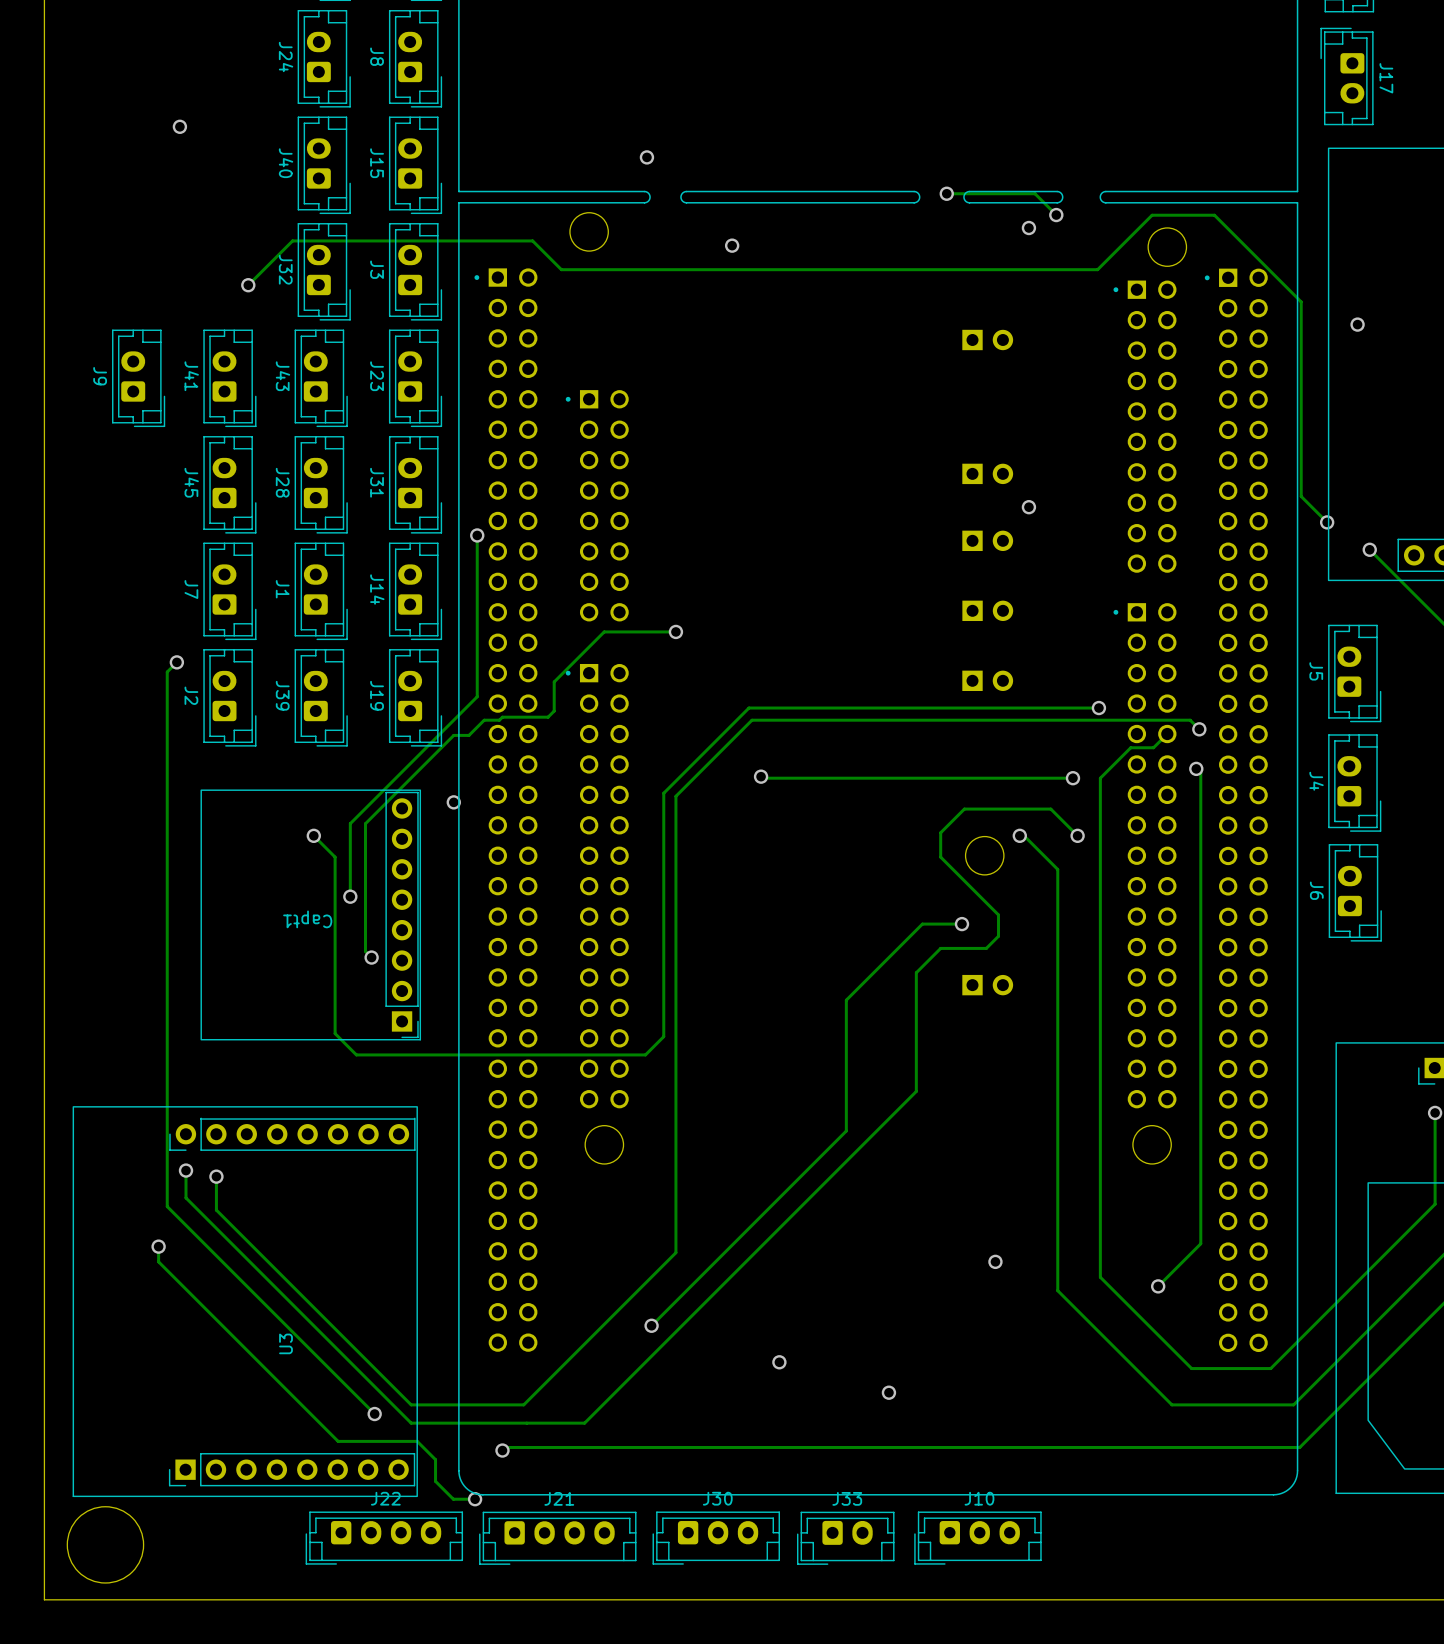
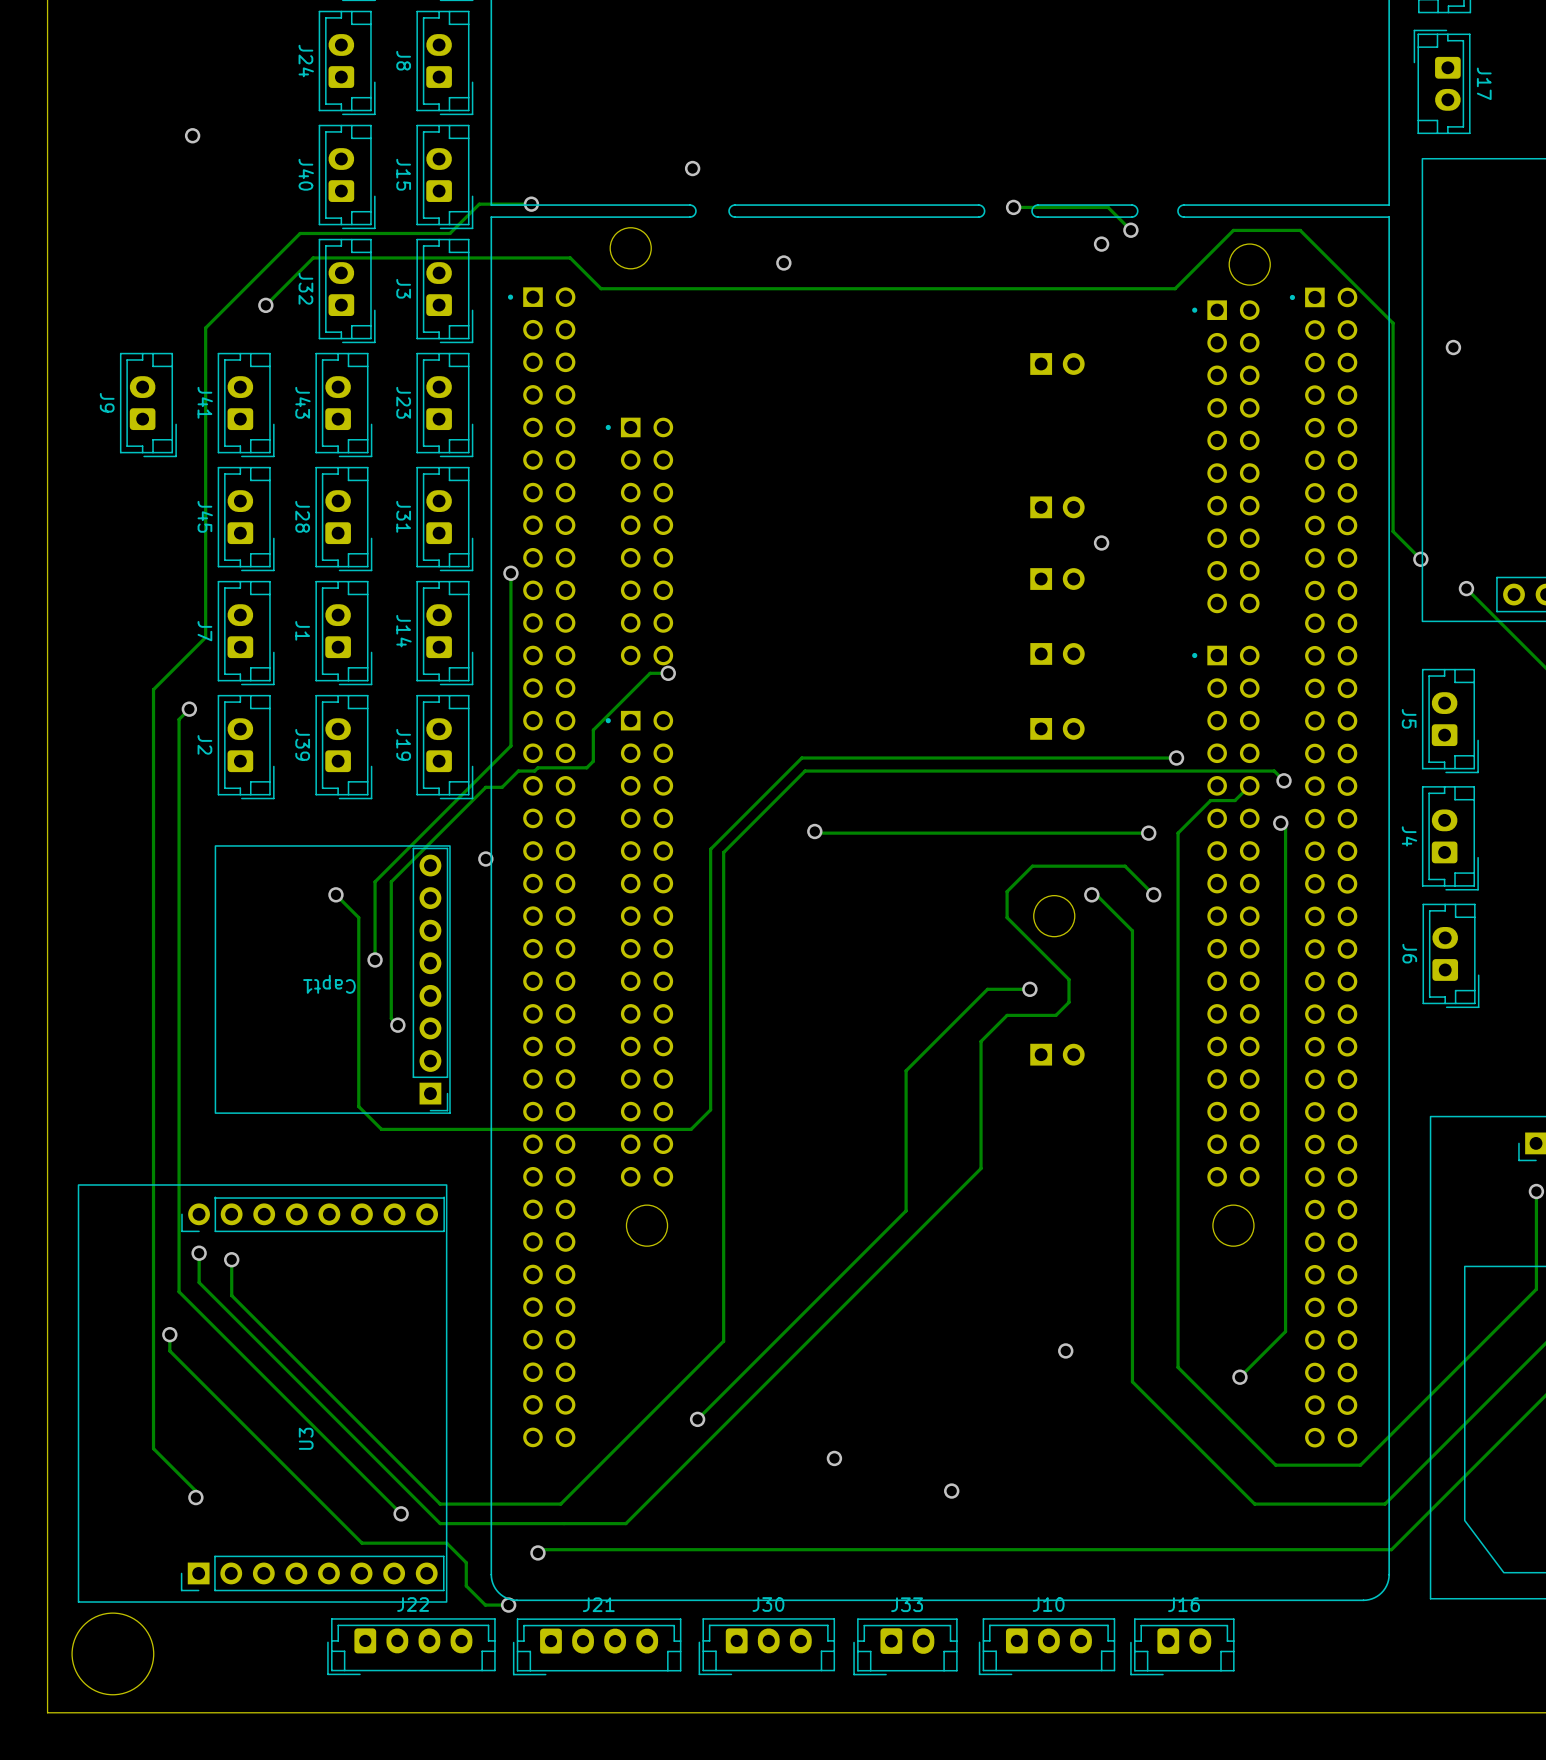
track: none -> (531, 204) (479, 204) (449, 233) (300, 233) (205, 327) (205, 637) (153, 689) (153, 1448) (195, 1491) (195, 1497)
via: none -> (531, 204)
track: (675, 631) (604, 631) -> (668, 673) (650, 673) (646, 676)
via position: (675, 631) -> (668, 673)
via: none -> (195, 1497)
J16: none -> (1182, 1646)

